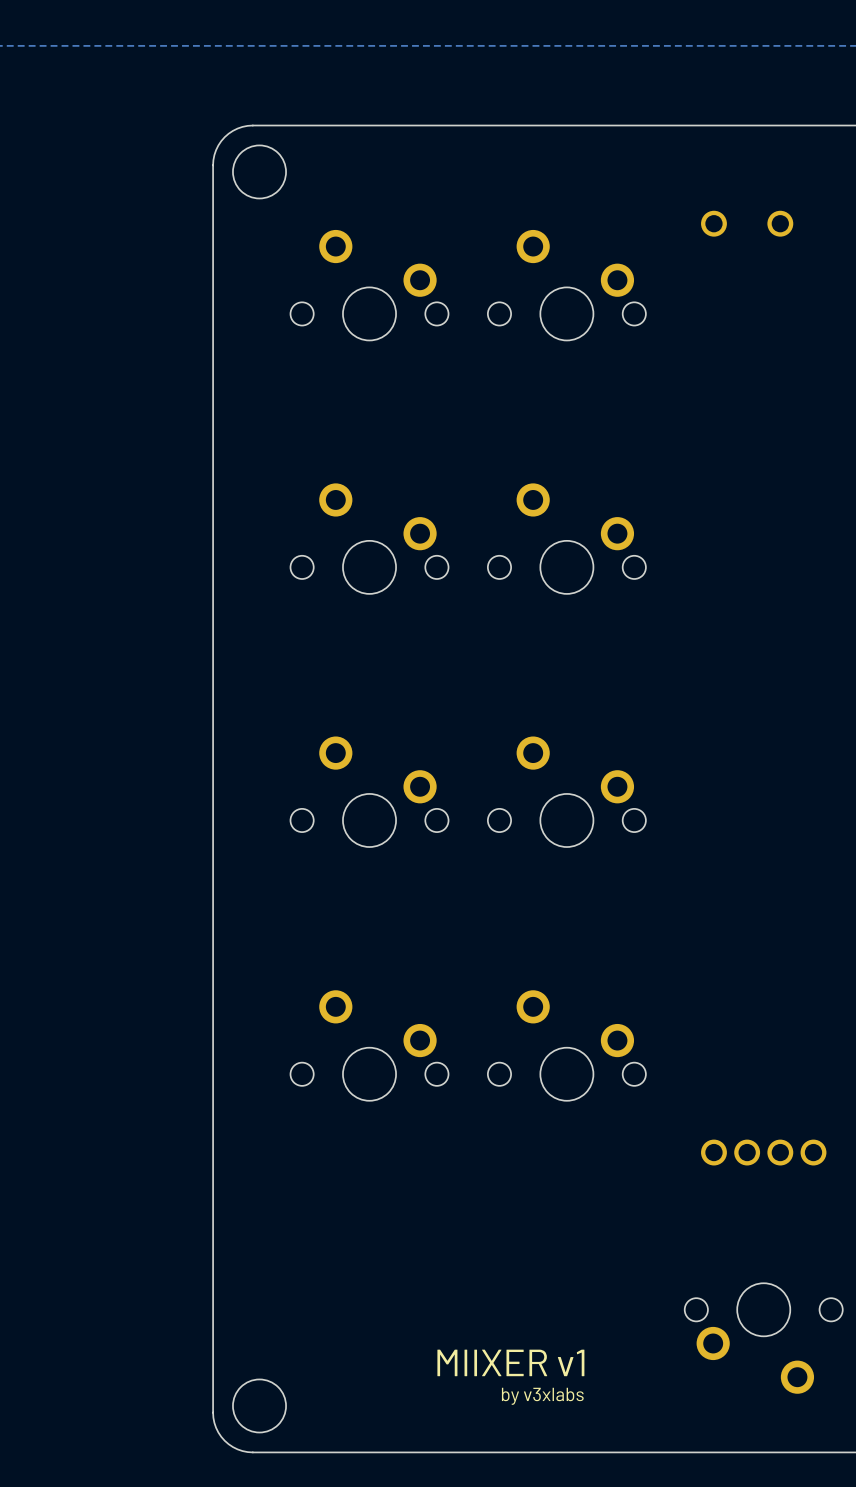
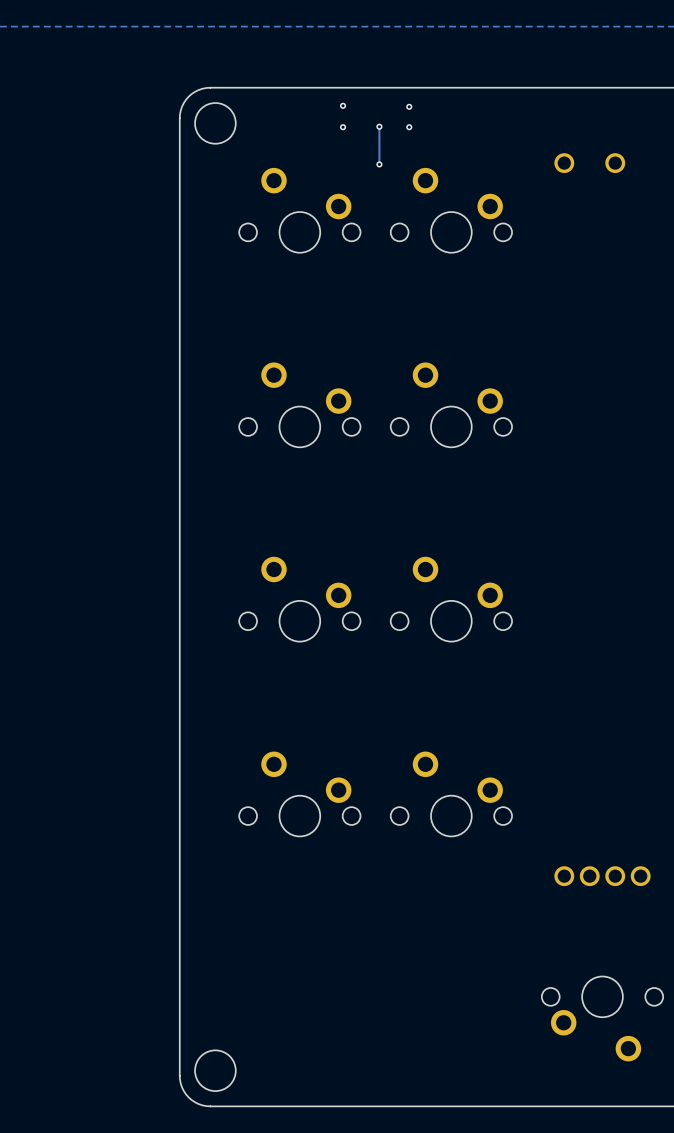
via: none -> (343, 105)
via: none -> (409, 106)
via: none -> (343, 127)
track: none -> (379, 126) (379, 164)
via: none -> (379, 126)
via: none -> (409, 127)
via: none -> (379, 164)
text: MIIXER v1 (510, 1362) -> none
text: by v3xlabs (542, 1396) -> none

